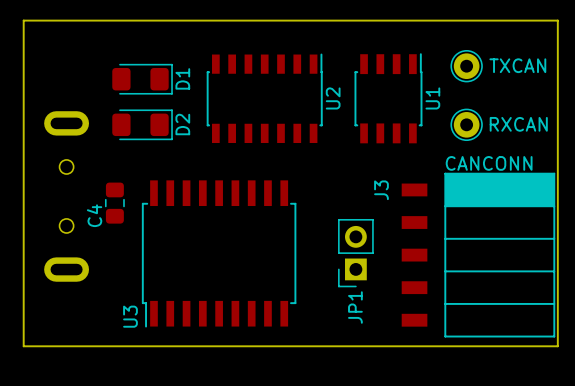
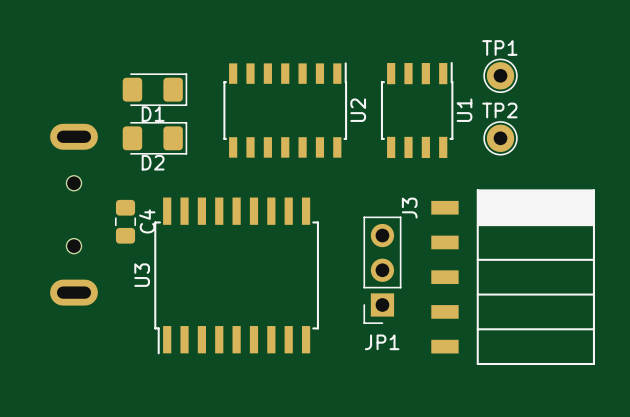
board edge: (23, 20) (23, 346) (557, 346) (557, 20) (23, 20) -> none
TXCAN name: TXCAN (517, 65) -> TP1 (499, 47)
D1 name rotation: 0° (182, 78) -> 90° clockwise (153, 114)
D1 name position: D1 (182, 78) -> D1 (153, 114)
D2 name rotation: 0° (182, 124) -> 90° clockwise (153, 162)
D2 name position: D2 (182, 124) -> D2 (153, 162)
RXCAN name: RXCAN (518, 124) -> TP2 (499, 110)
text: CANCONN (489, 163) -> none
C4 name position: C4 (94, 215) -> C4 (147, 221)
JP1 footprint: [338, 219, 374, 288] -> [363, 216, 402, 324]
U3 name position: U3 (130, 316) -> U3 (142, 275)

